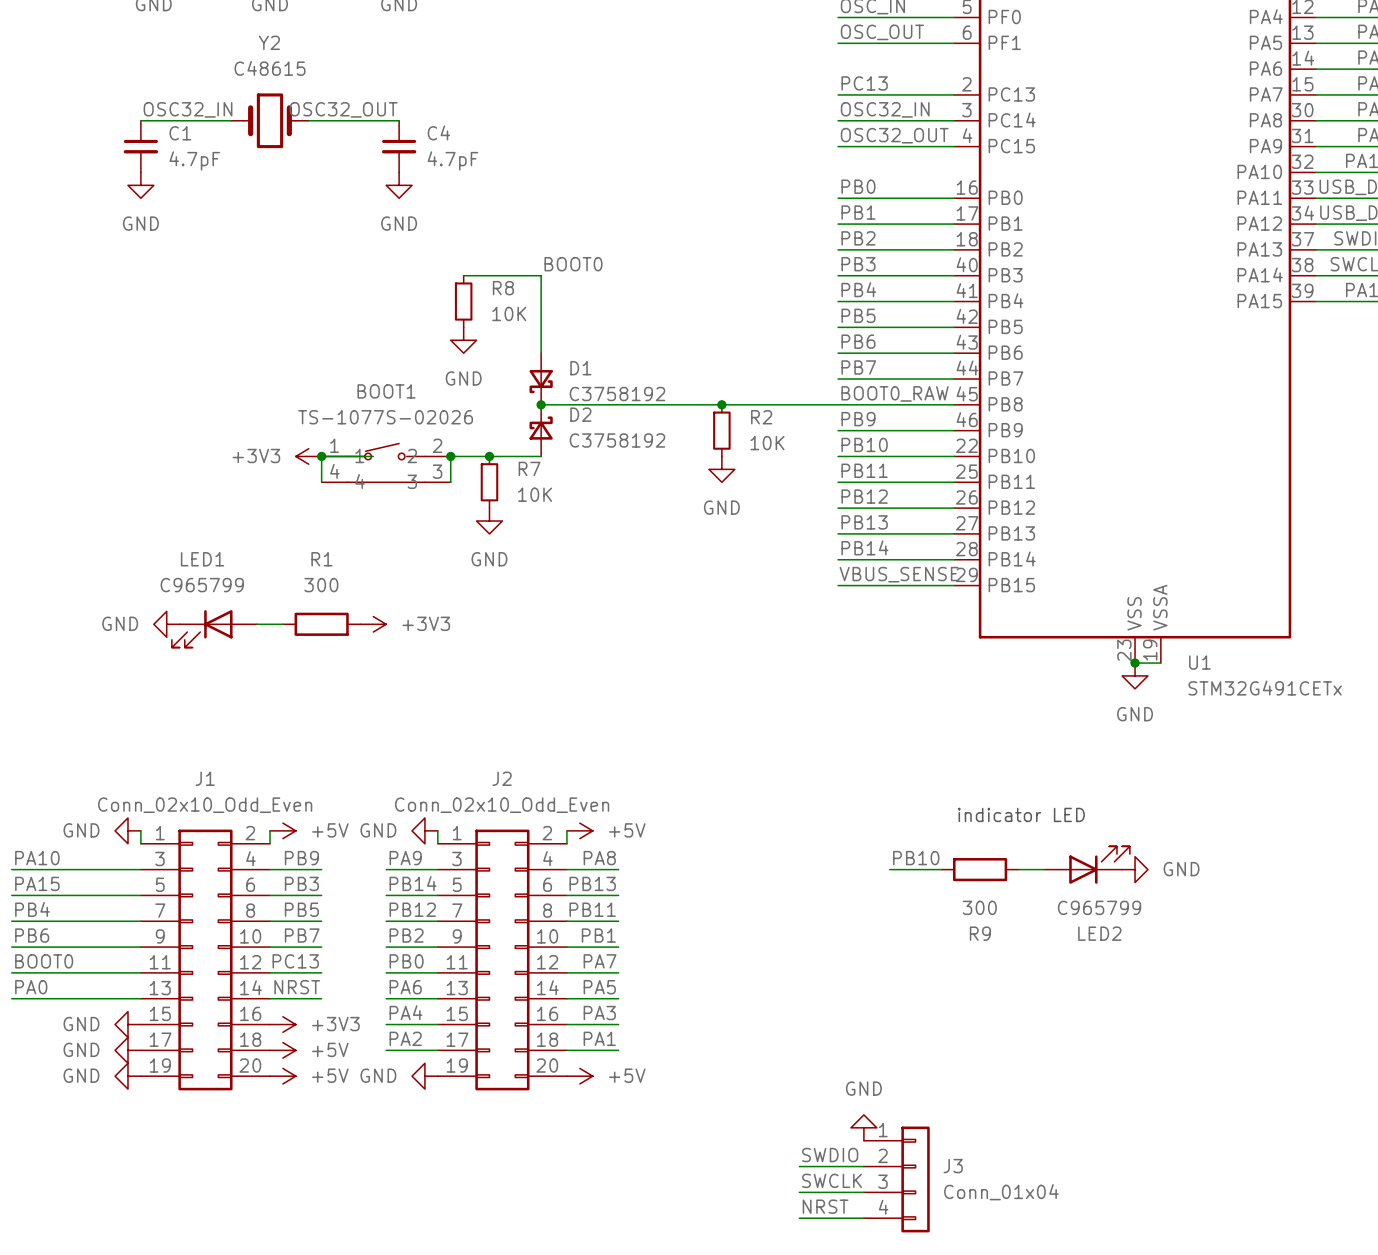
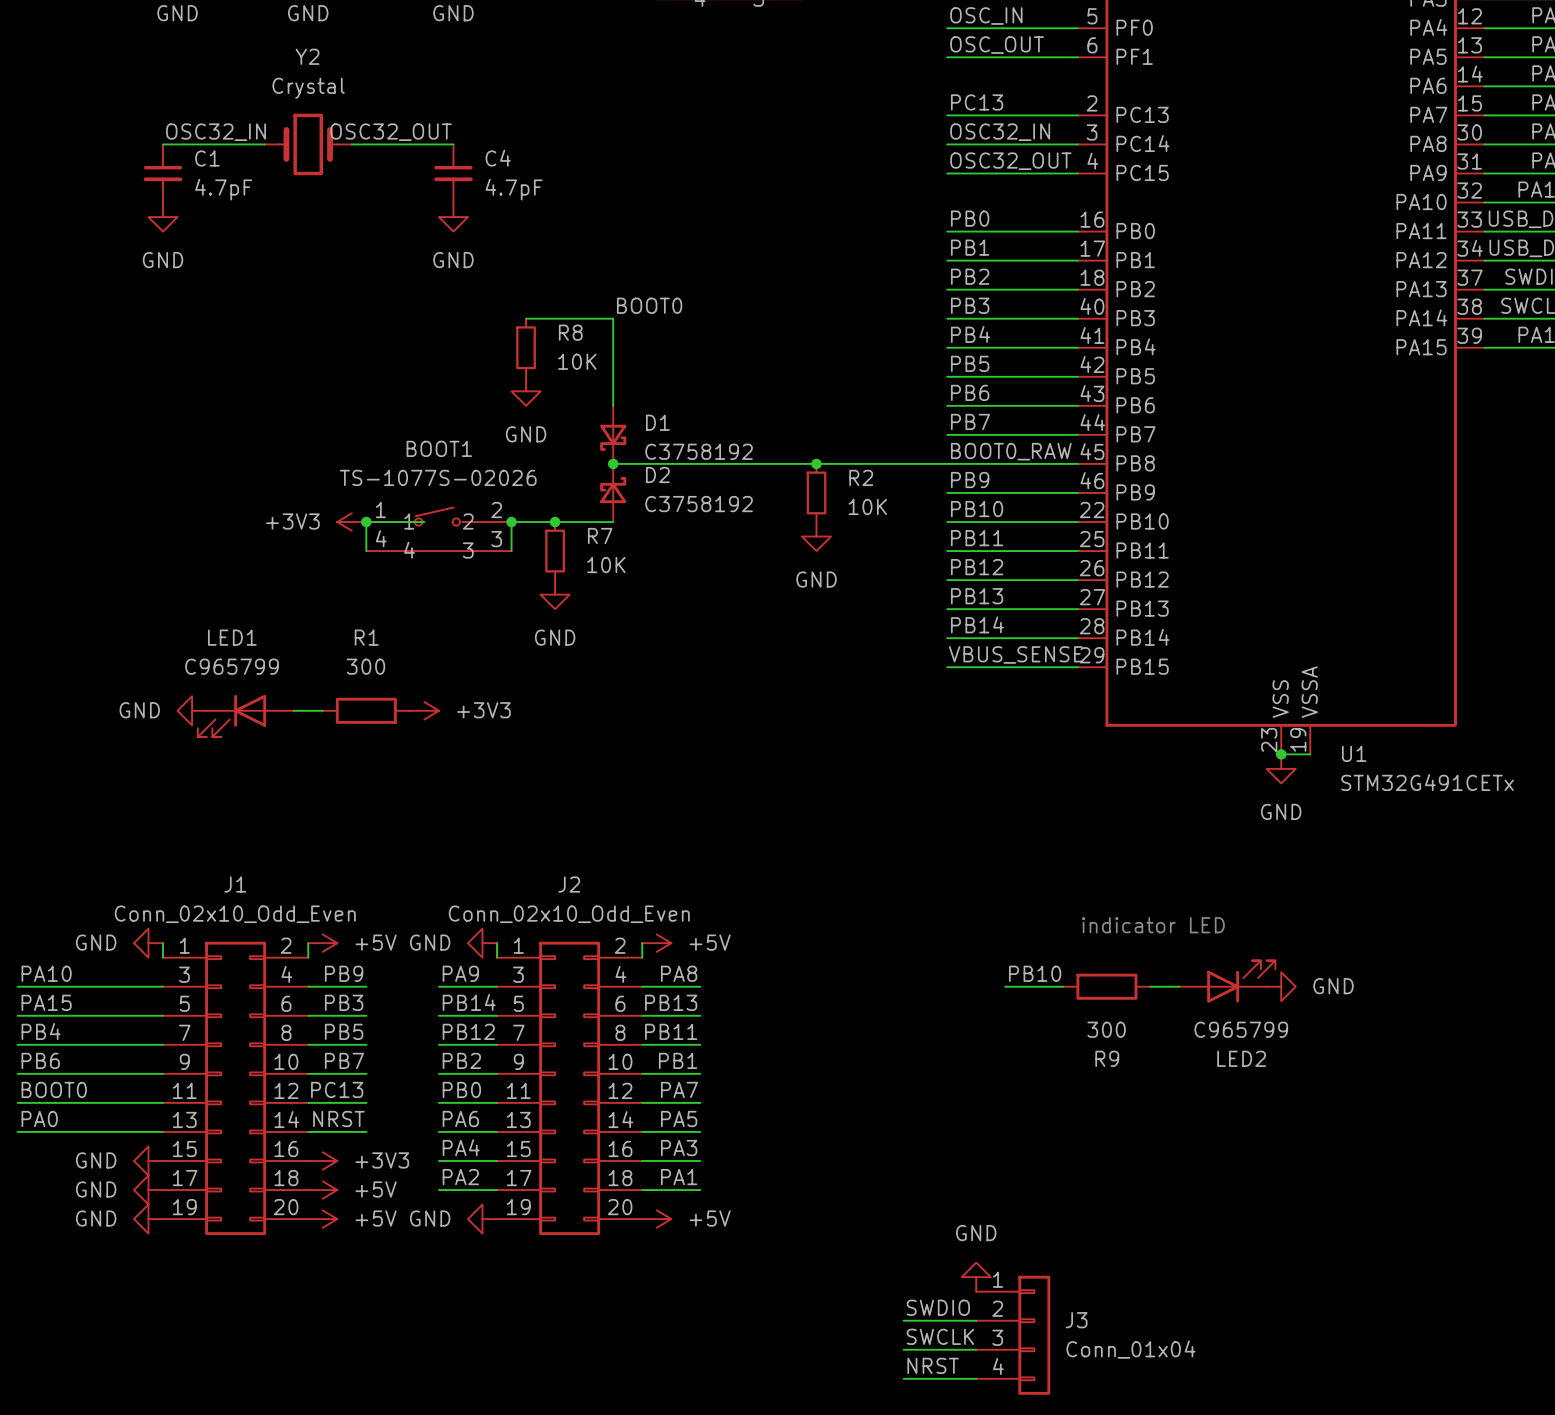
Y2 value: C48615 (270, 68) -> Crystal (308, 88)

